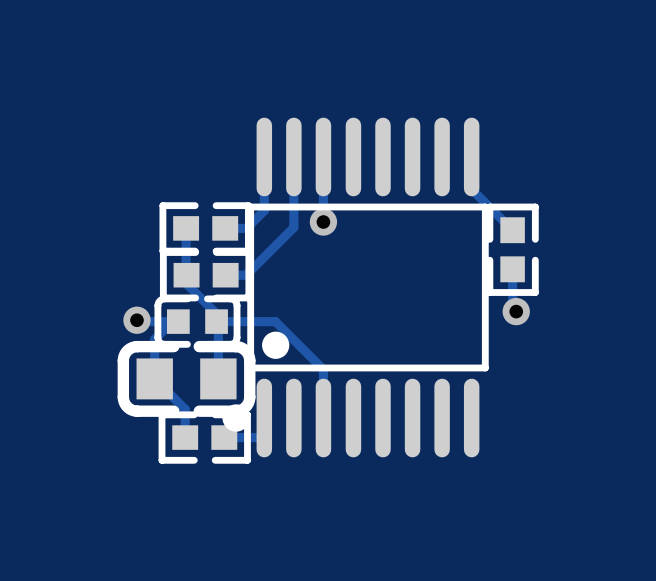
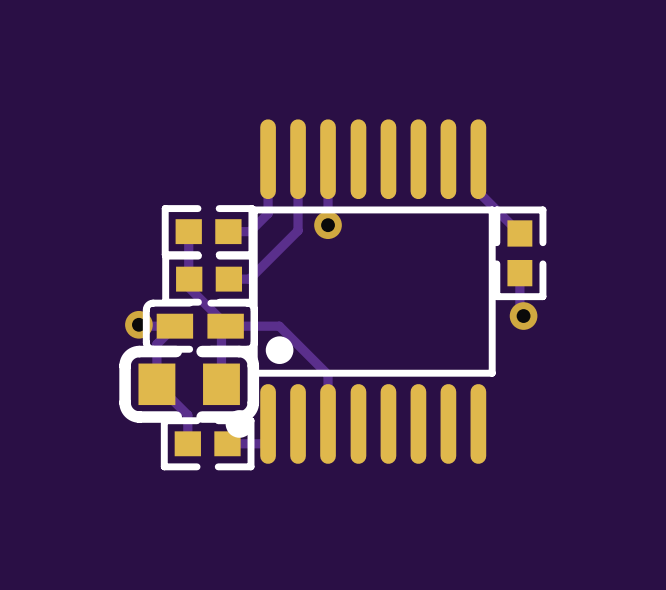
part footprint: [154, 295, 241, 348] -> [142, 299, 258, 353]

